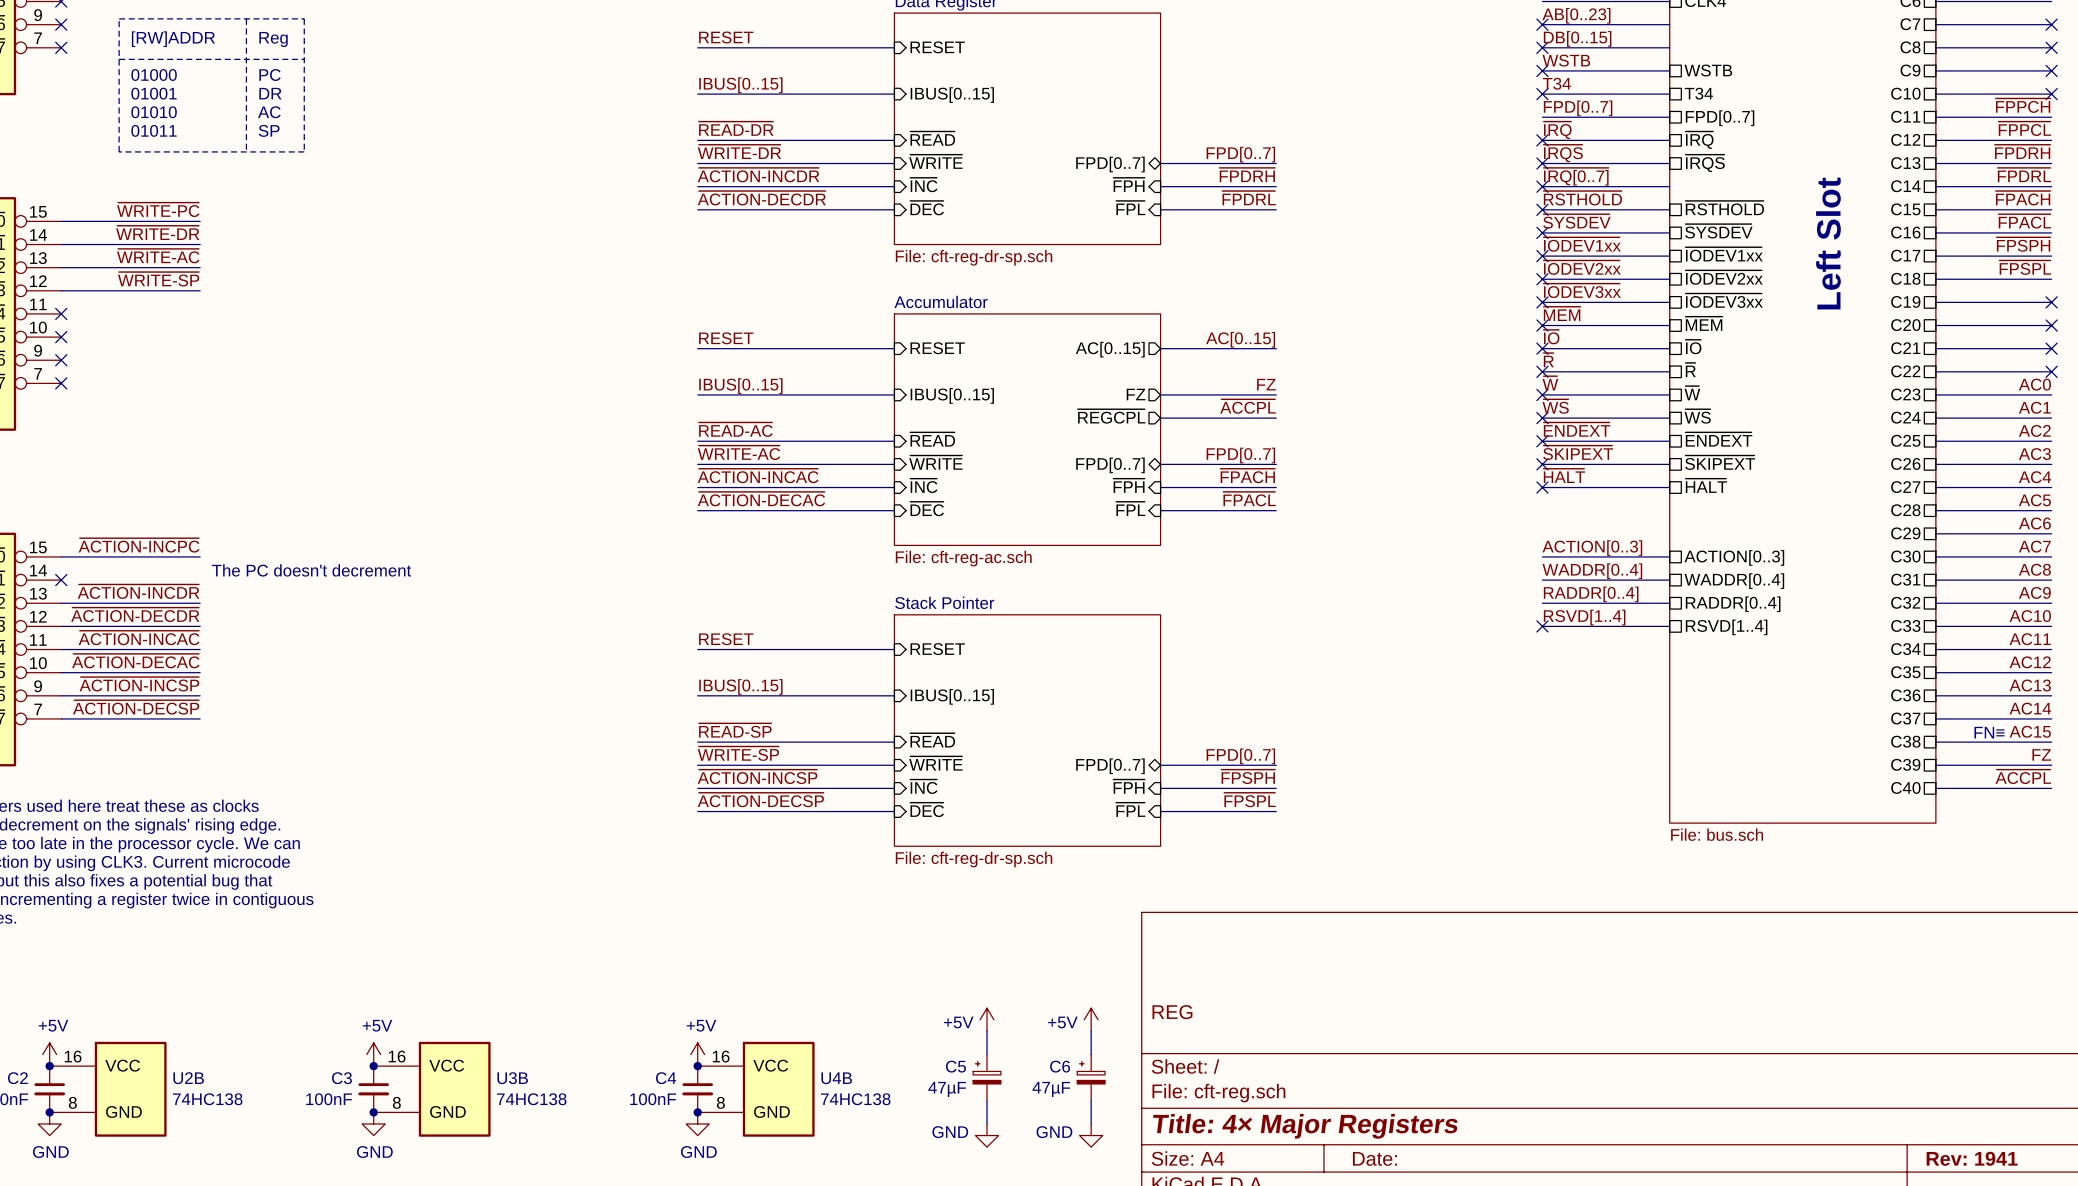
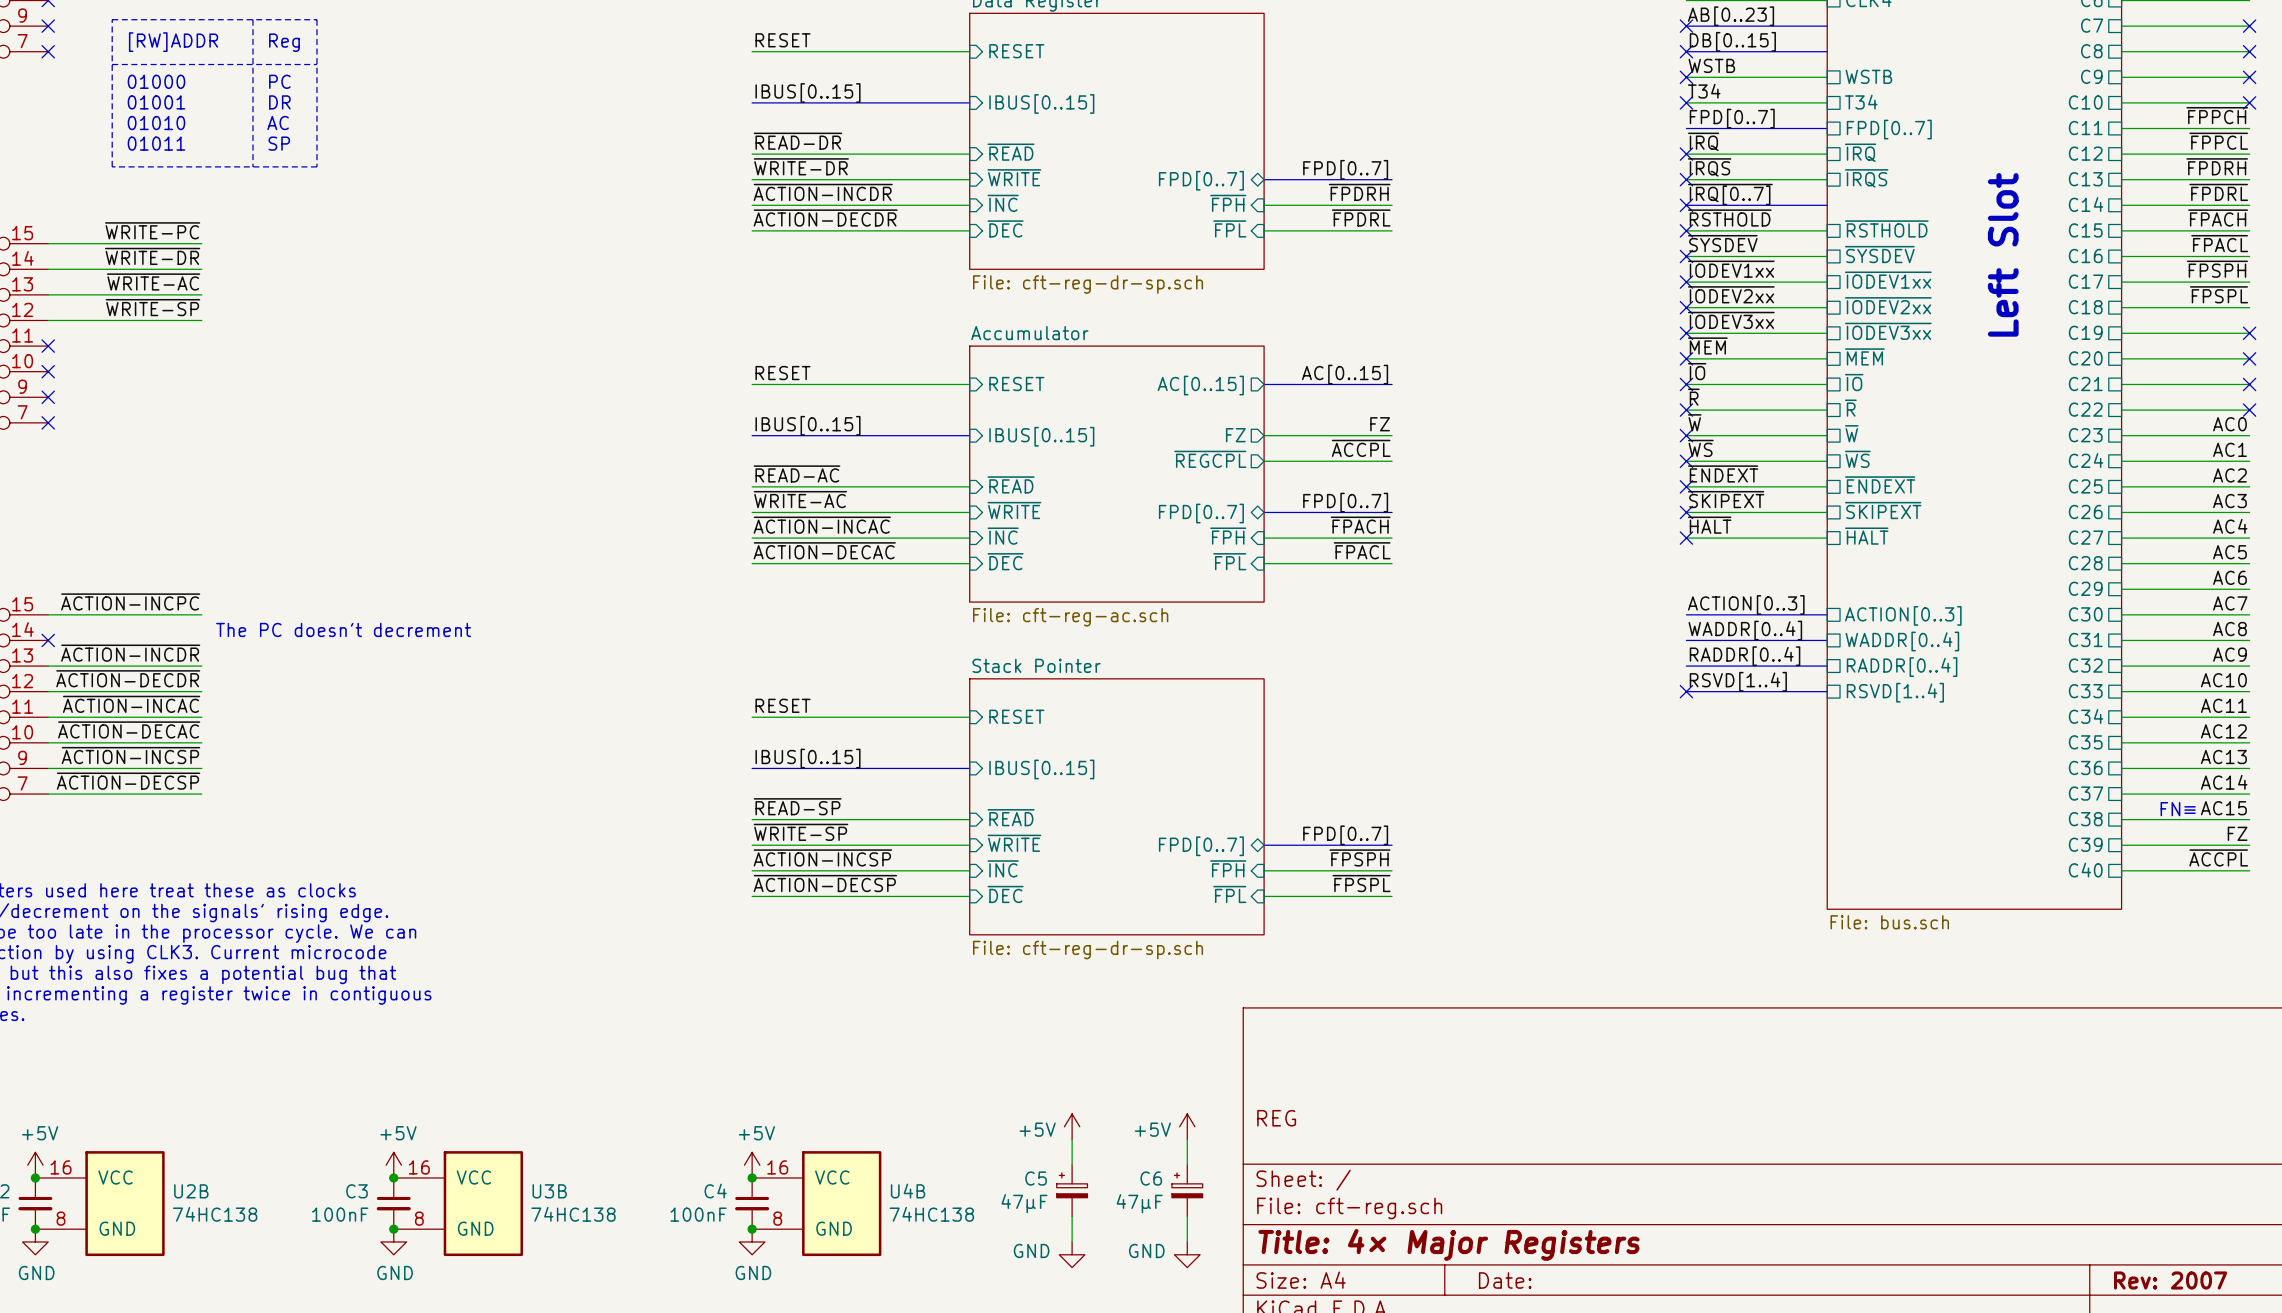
title block: Rev: 1941 (1972, 1158) -> Rev: 2007 (2170, 1280)

